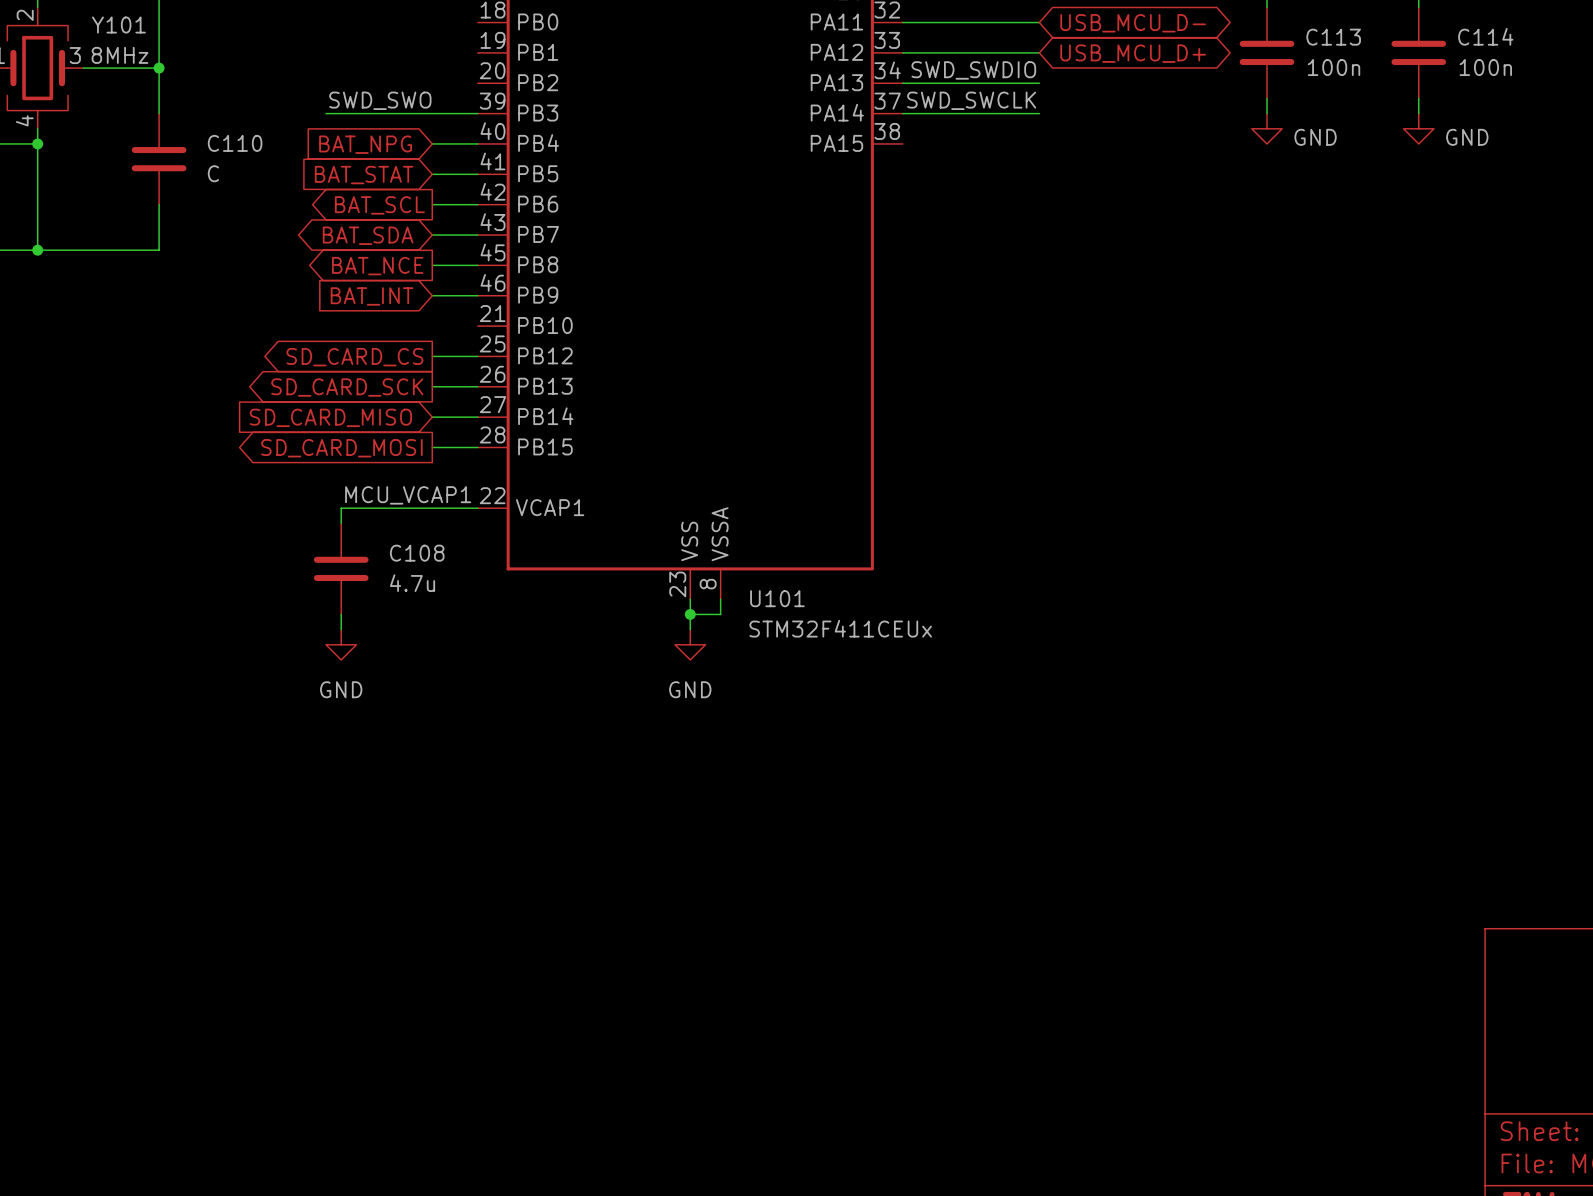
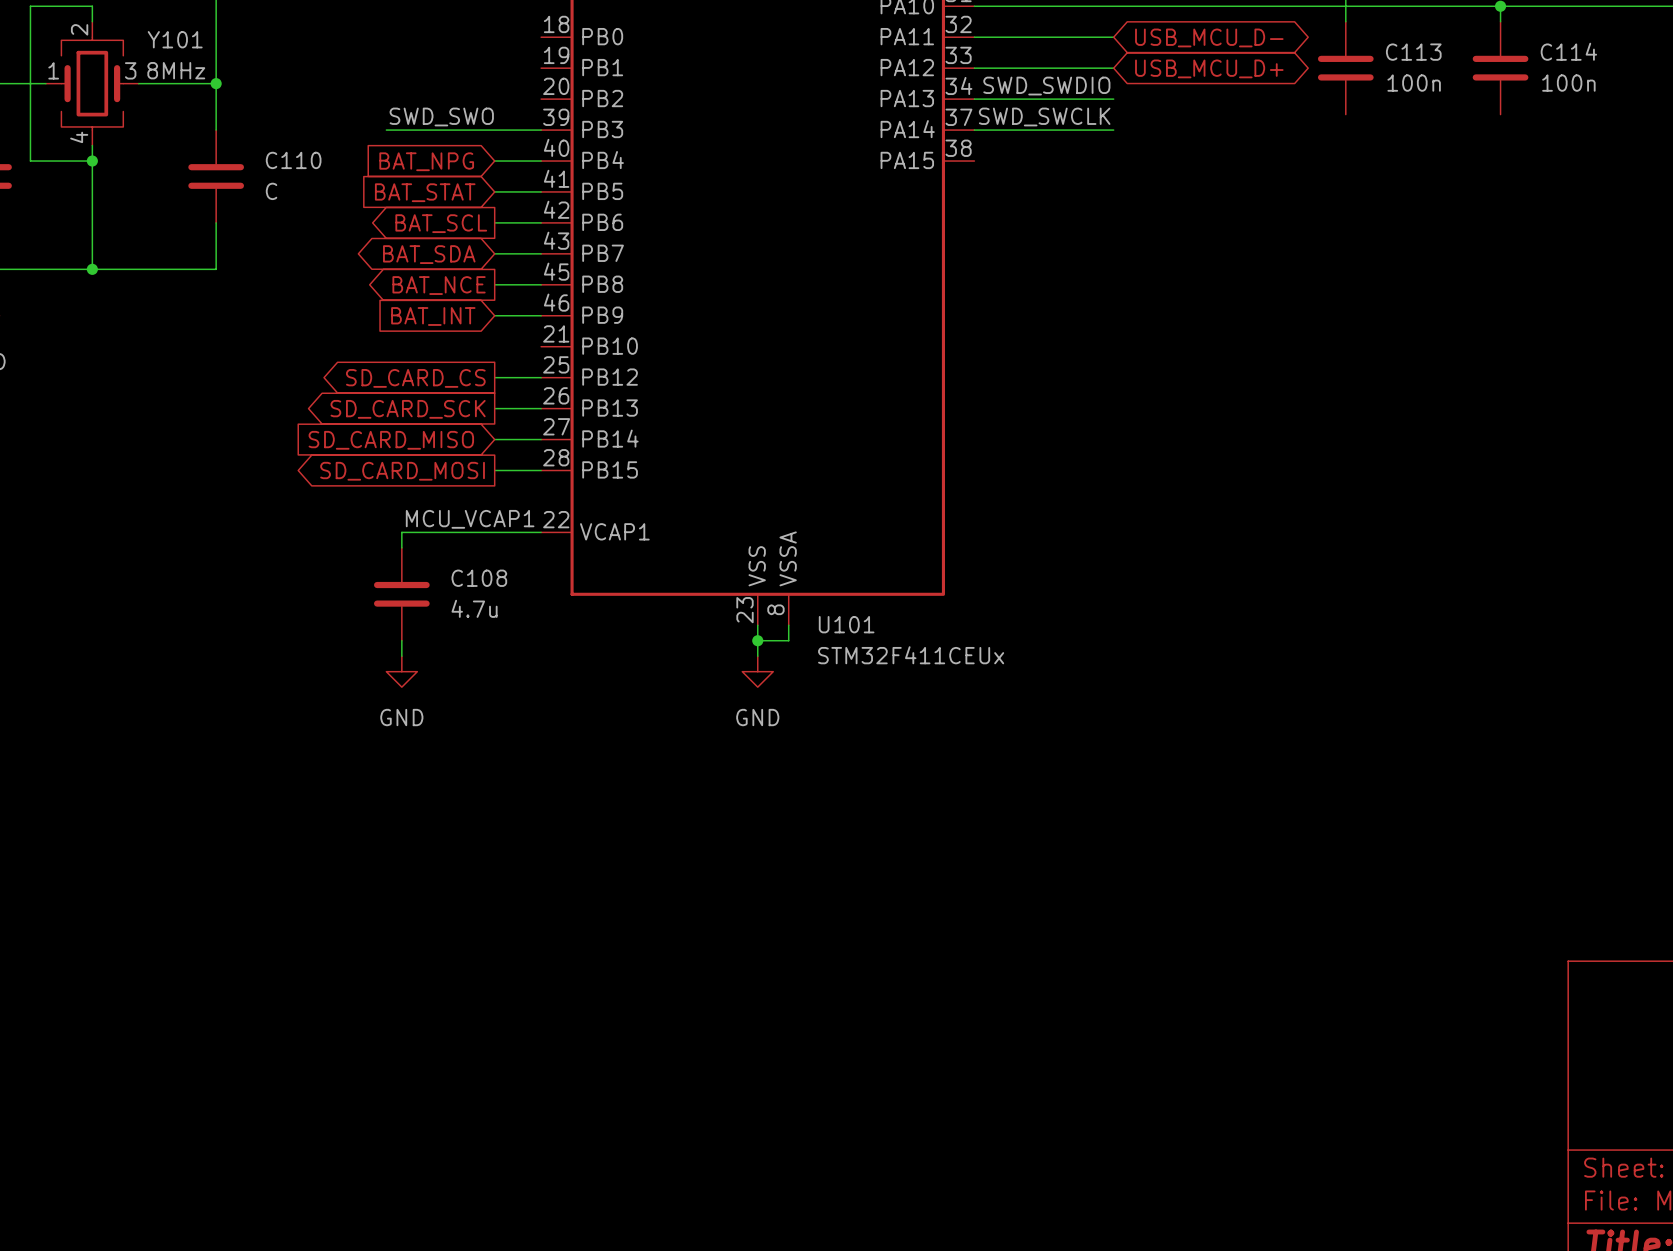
wire: (1266, 98) (1266, 113) -> none
wire: (1418, 98) (1418, 113) -> none
power symbol: GND (1266, 128) -> none
power symbol: GND (1418, 128) -> none

